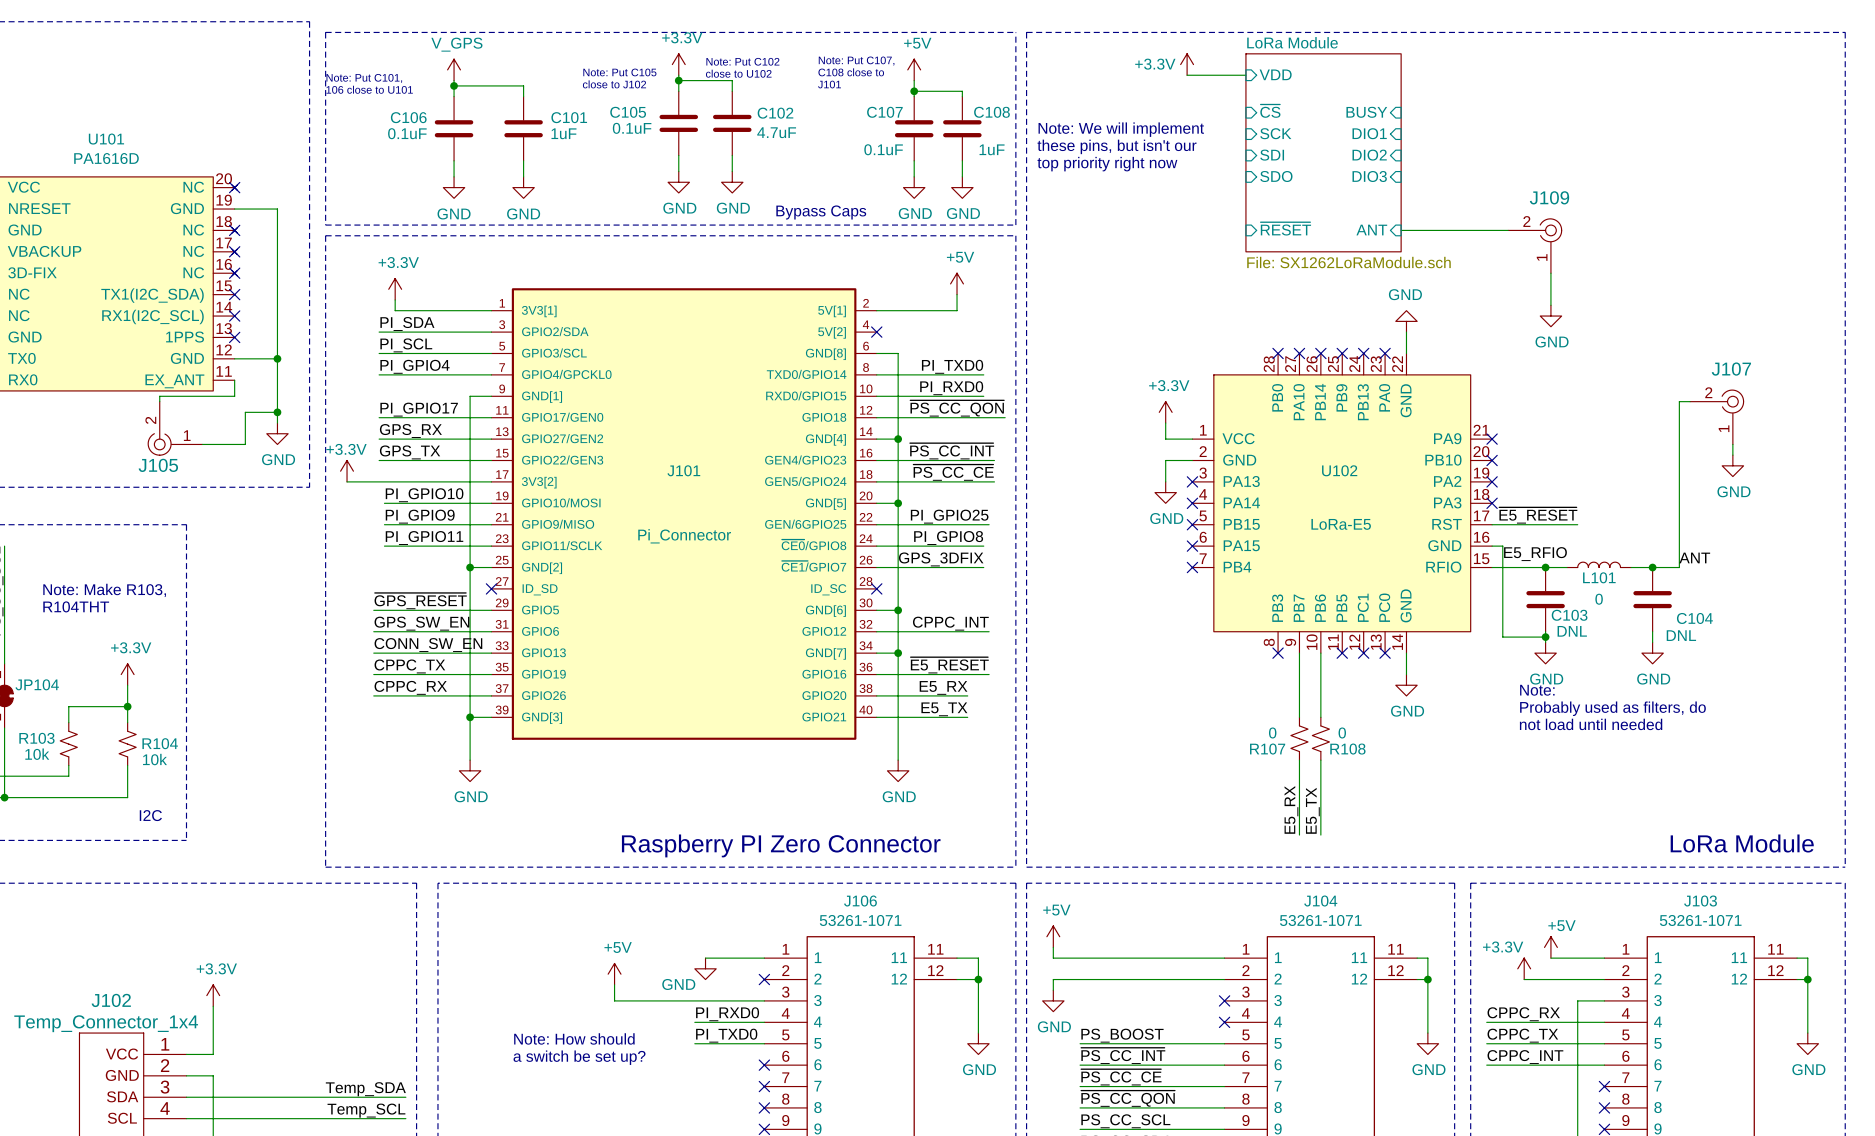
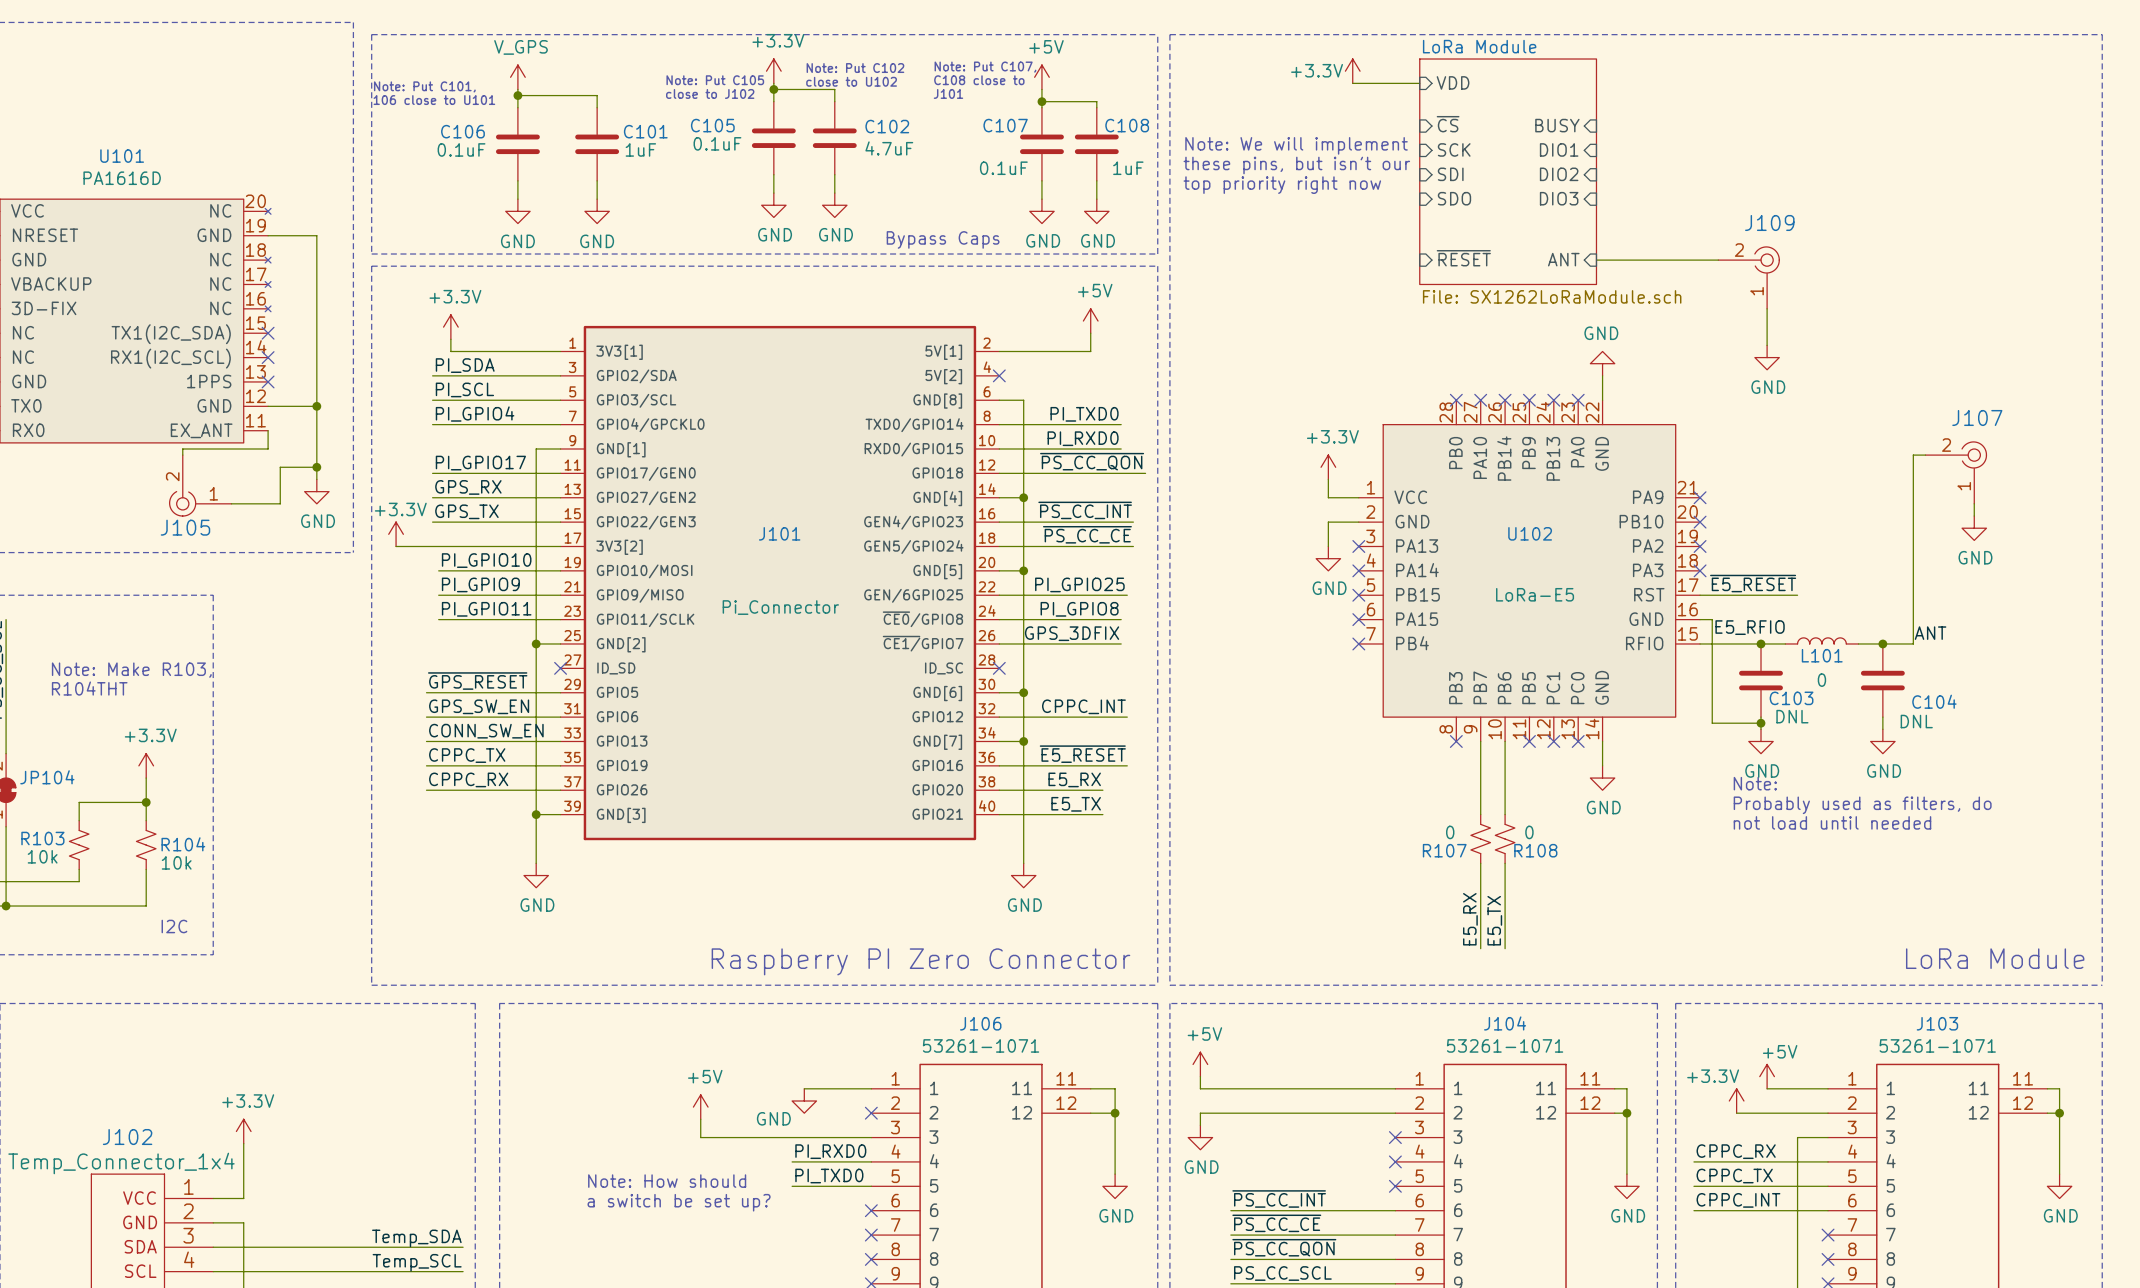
no-connect mark: (234, 187) -> none
no-connect mark: (234, 230) -> none
no-connect mark: (234, 251) -> none
no-connect mark: (234, 273) -> none
label: PS_BOOST (1122, 1035) -> none
wire: (1080, 1043) (1224, 1043) -> none
no-connect mark: none -> (1395, 1186)

